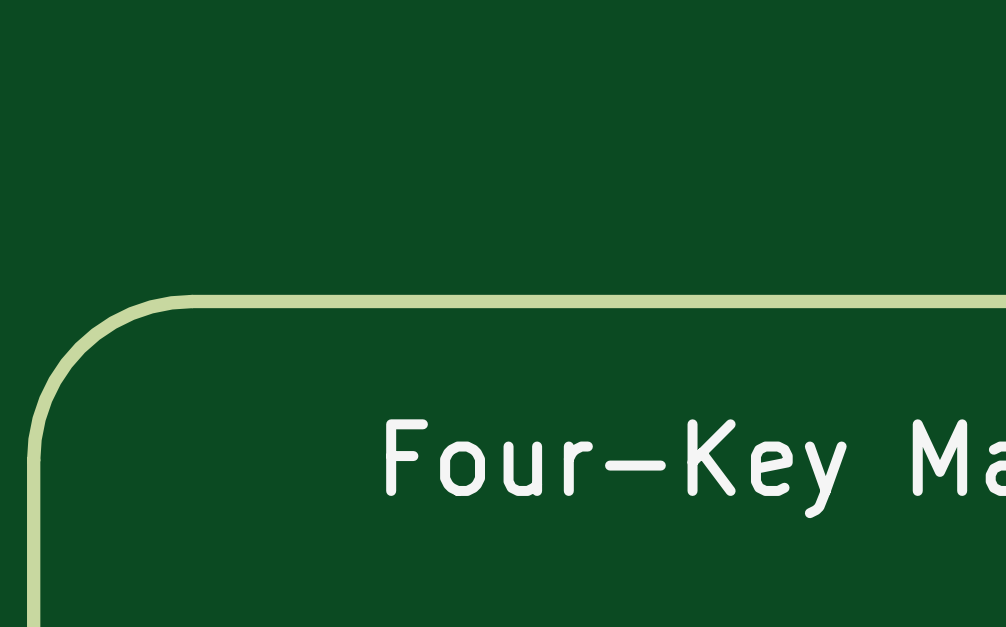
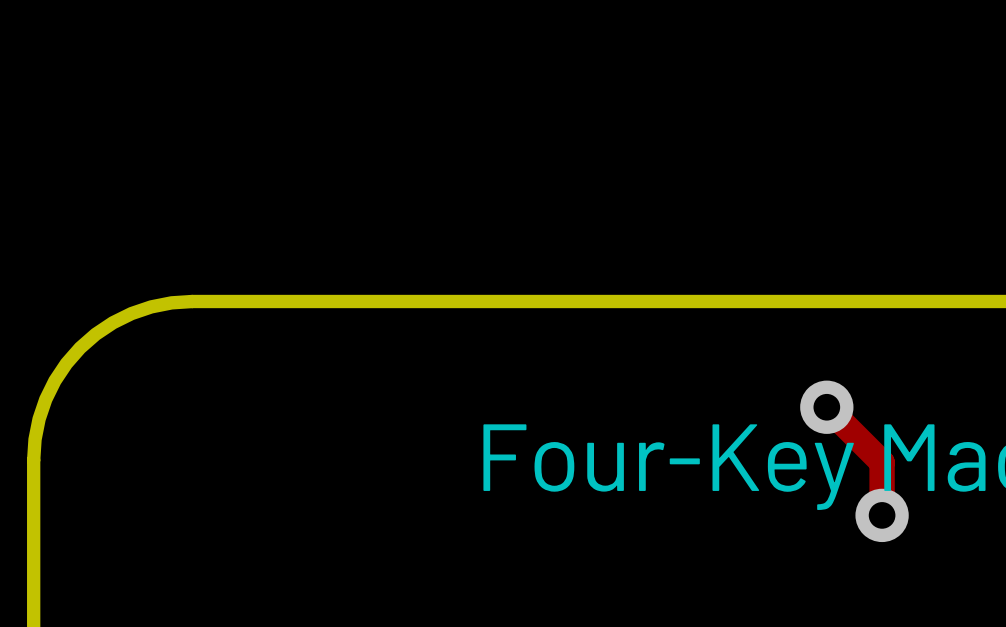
track: none -> (826, 407) (882, 462) (882, 515)
via: none -> (826, 407)
via: none -> (882, 515)

